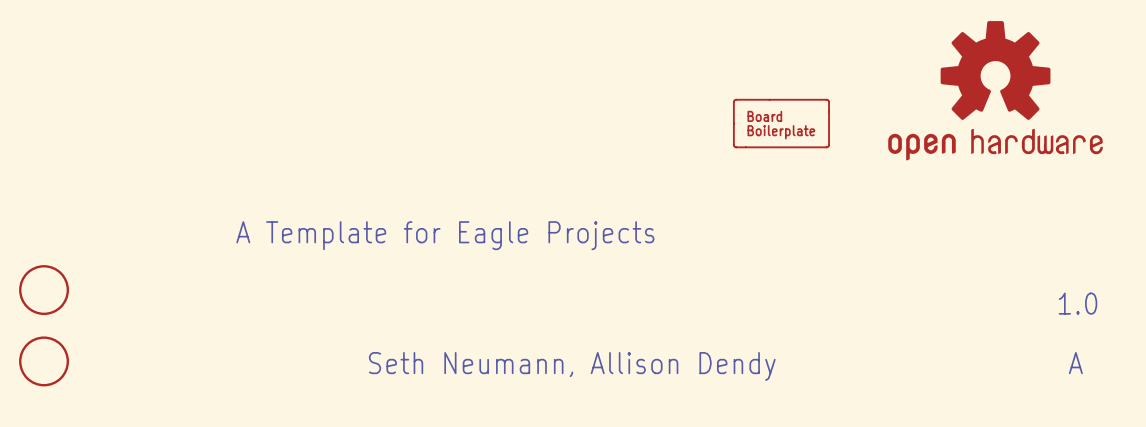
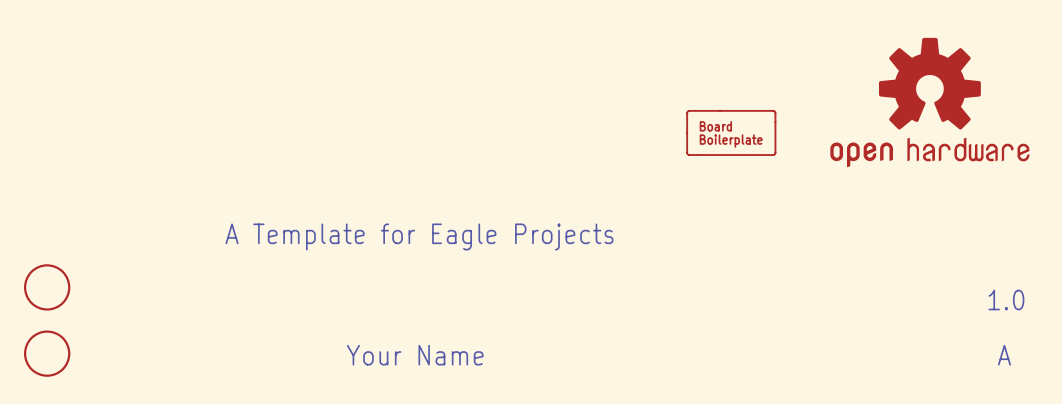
text: Seth Neumann, Allison Dendy (572, 366) -> Your Name (415, 355)

